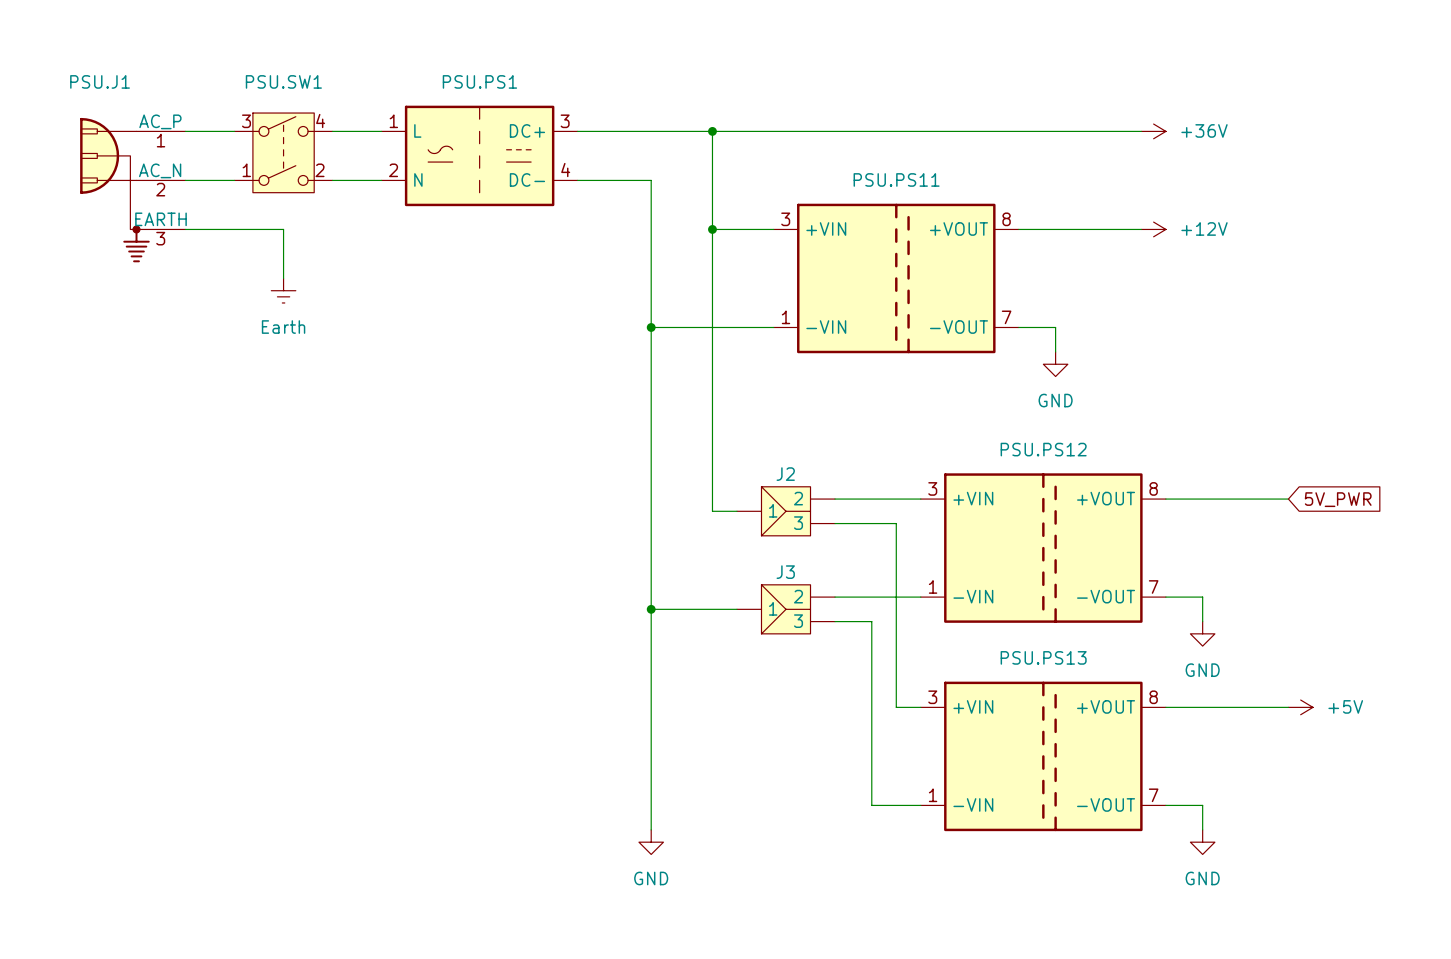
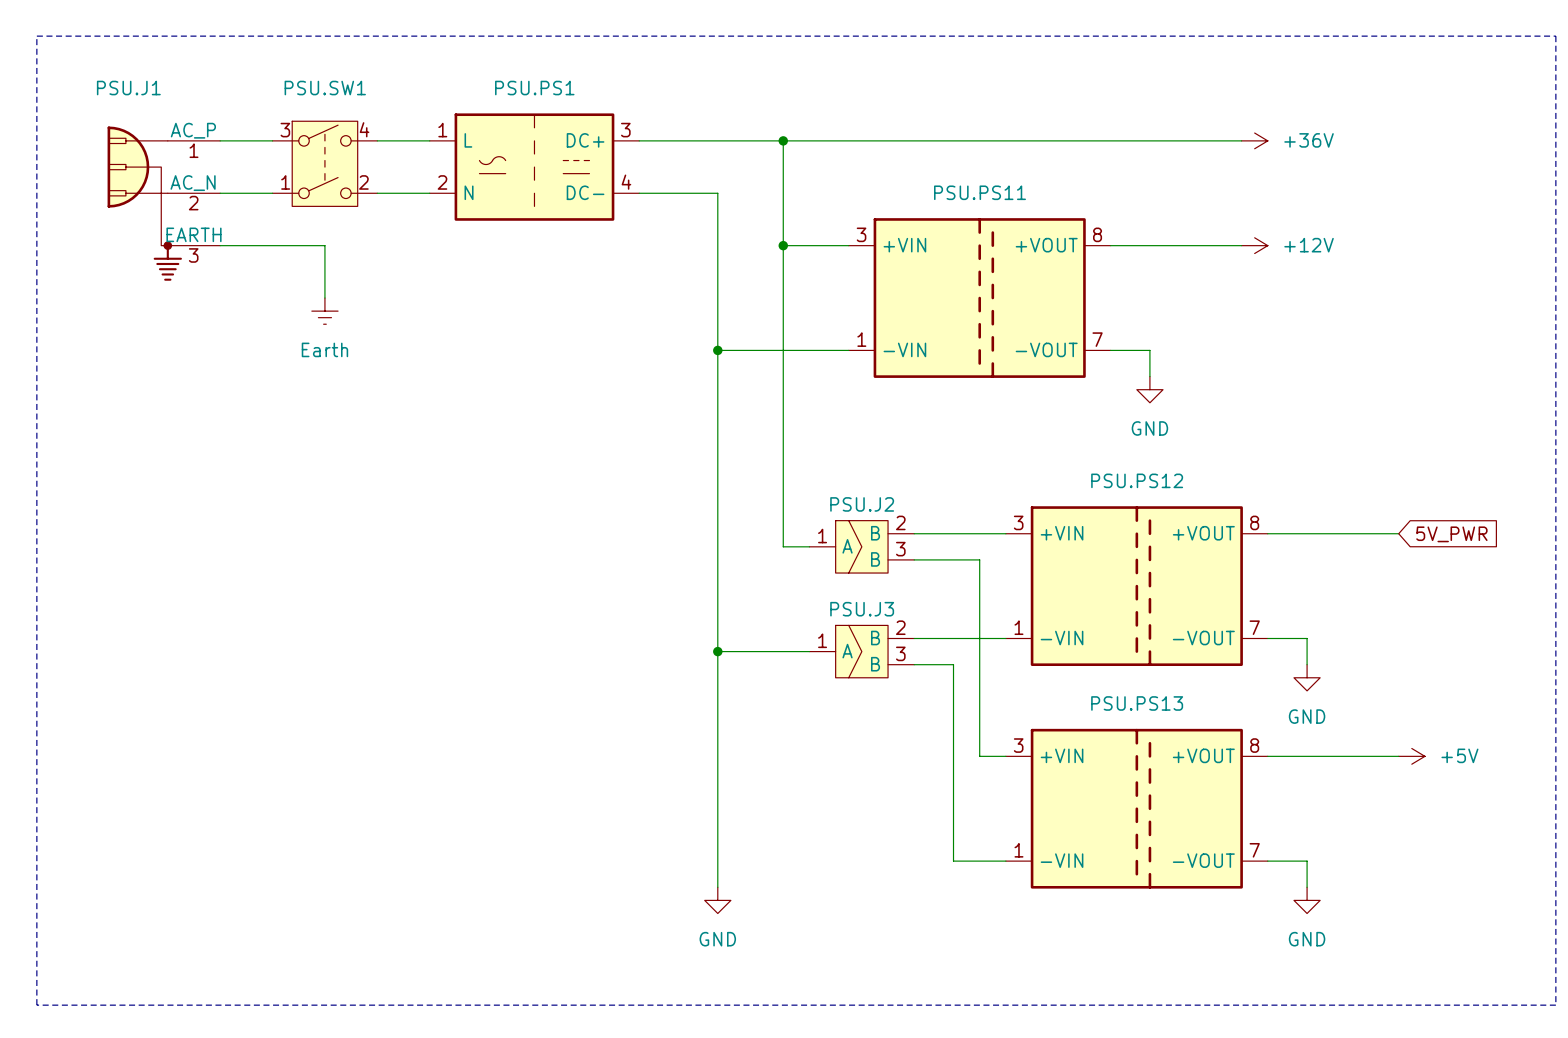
line: none -> (36, 36) (1555, 36) (1555, 1005) (36, 1005) (36, 36)
J2: (786, 511) -> none
PSU.J2: none -> (861, 546)
J3: (786, 609) -> none
PSU.J3: none -> (861, 651)

